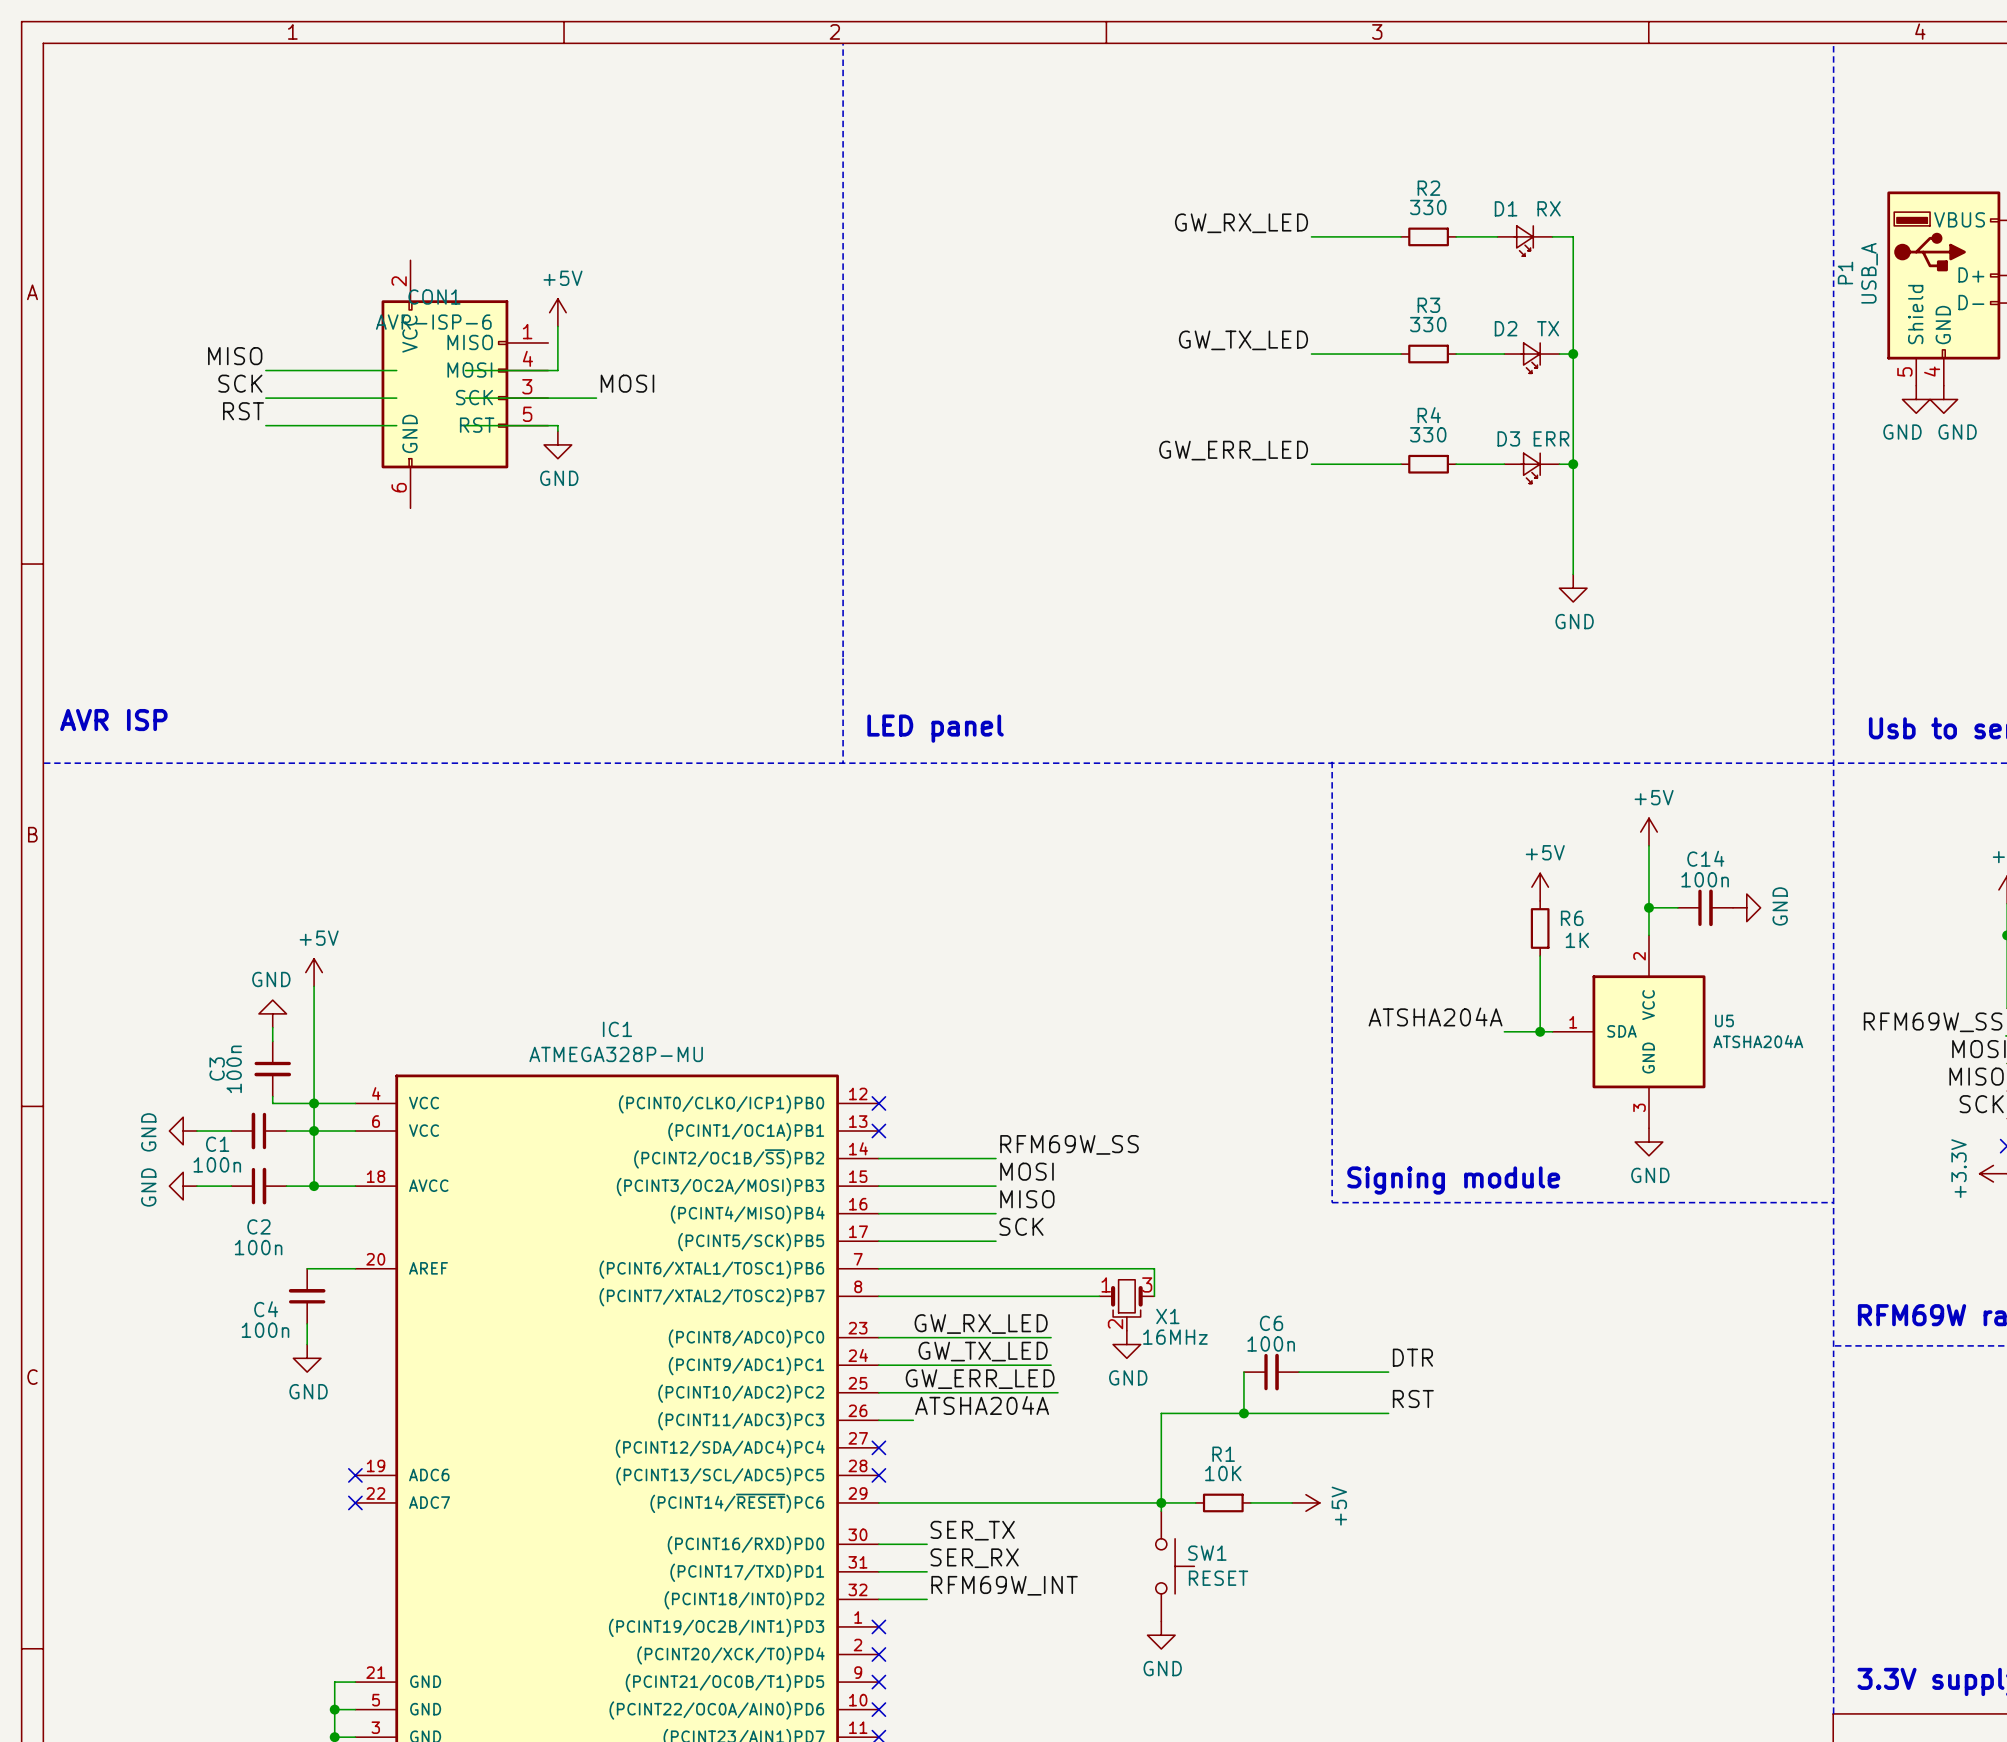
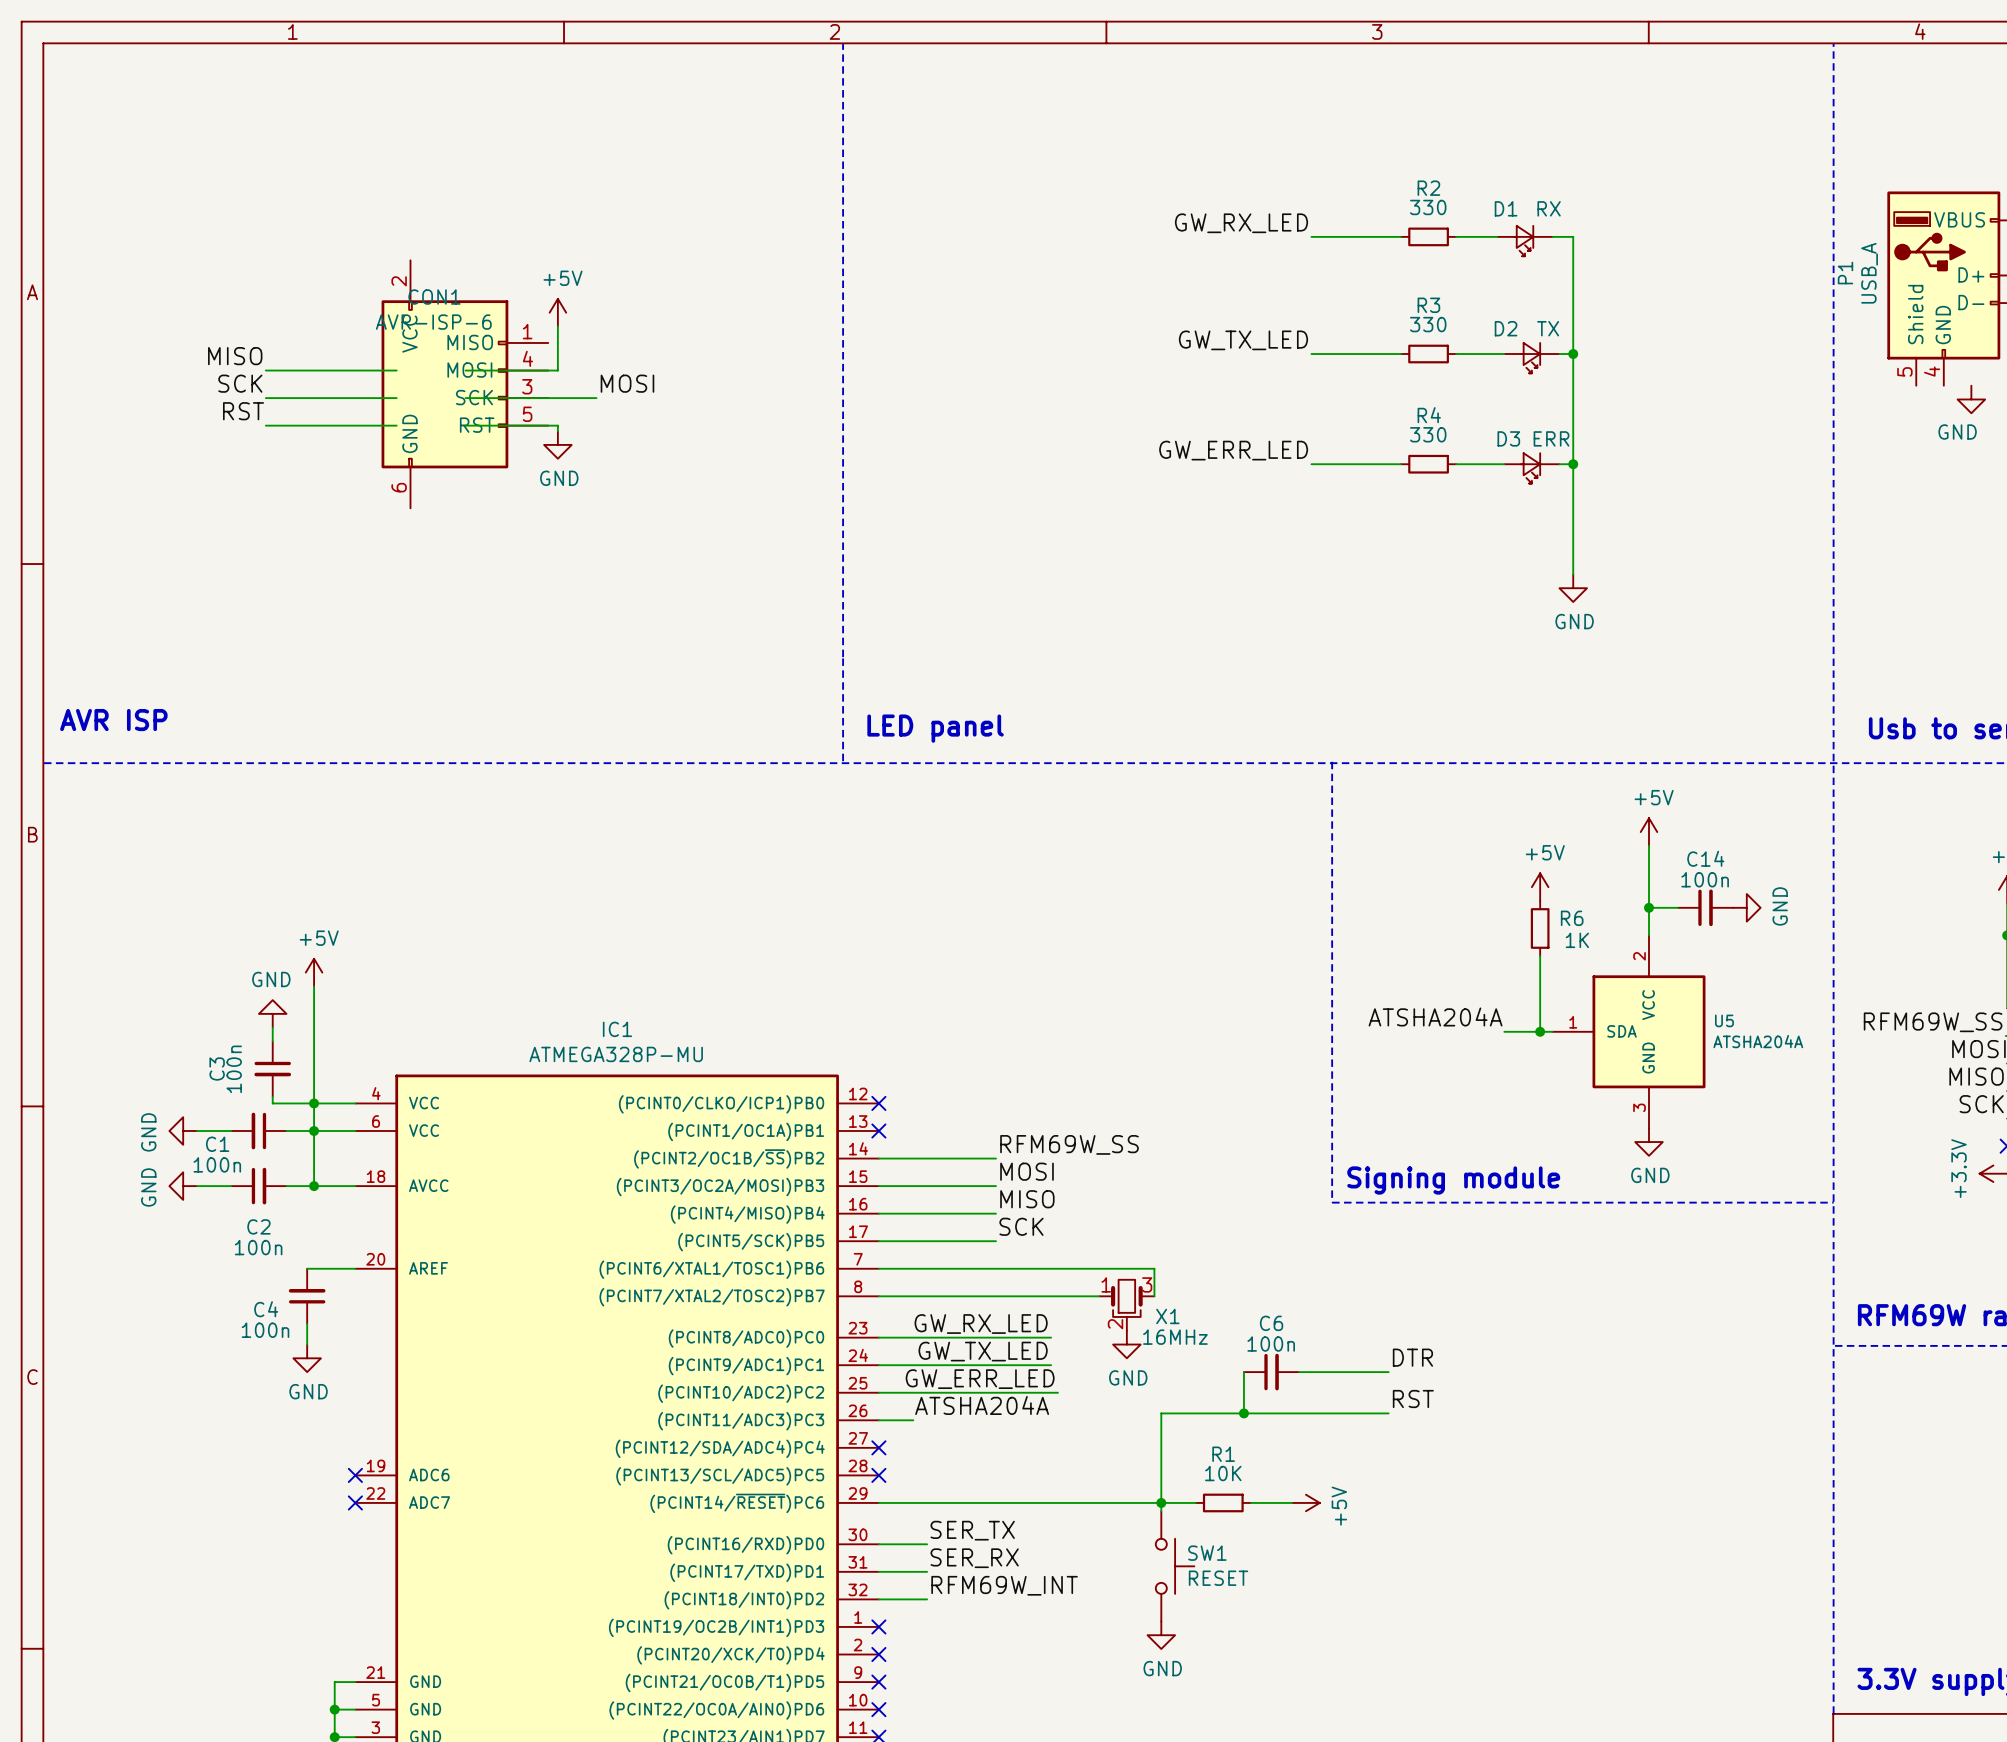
power symbol: GND (1916, 399) -> none
power symbol: GND (1943, 399) -> none
power symbol: none -> GND (1971, 399)

